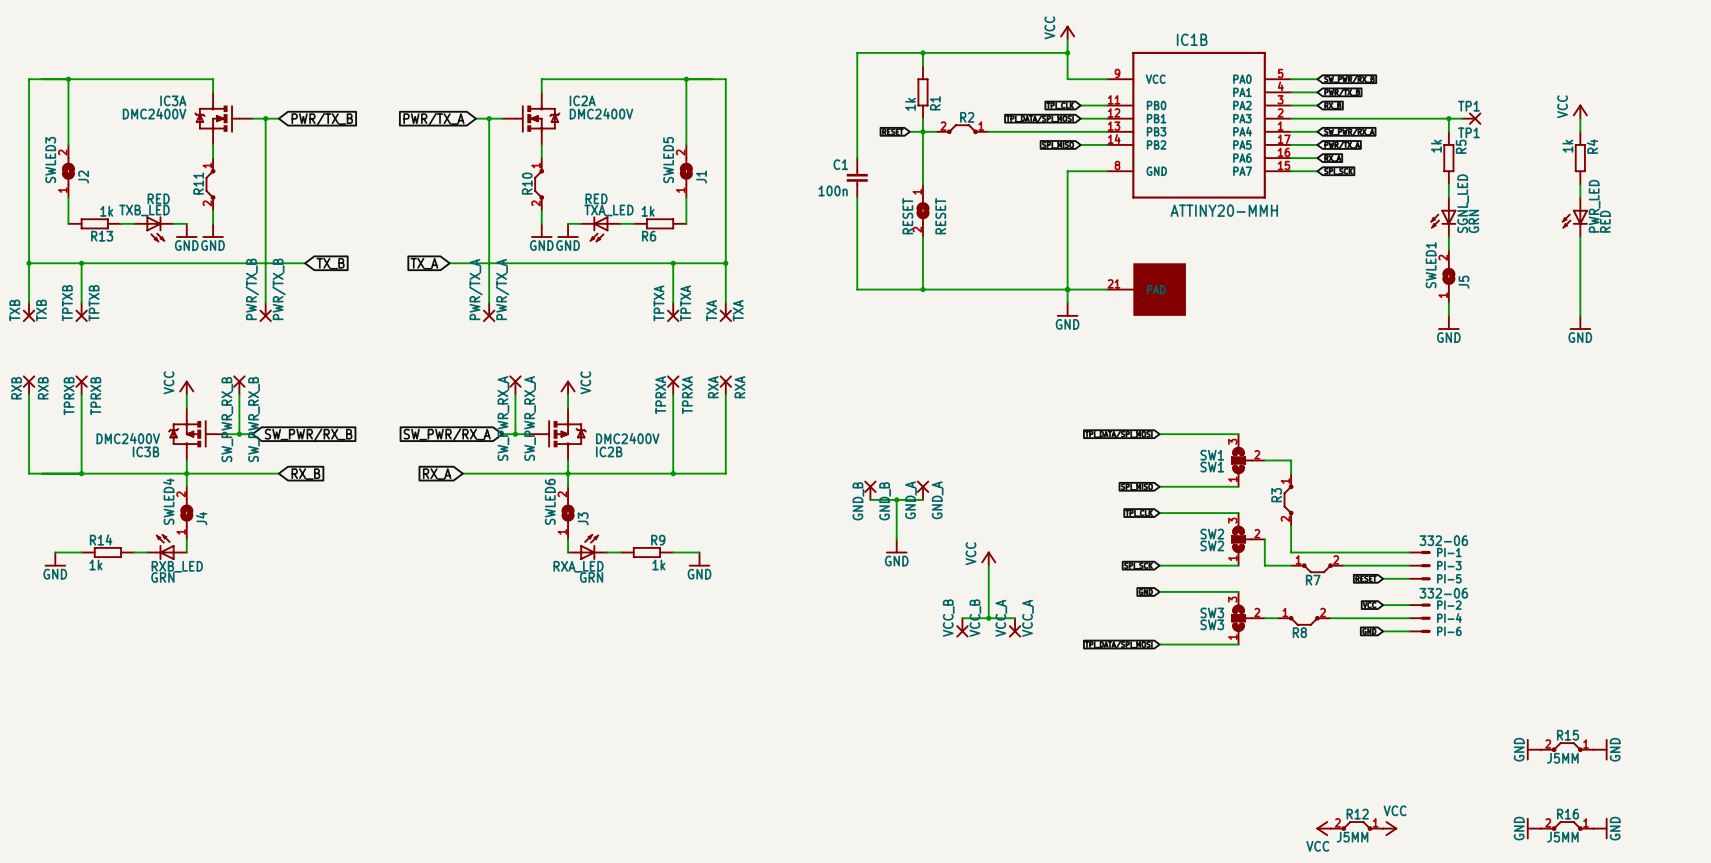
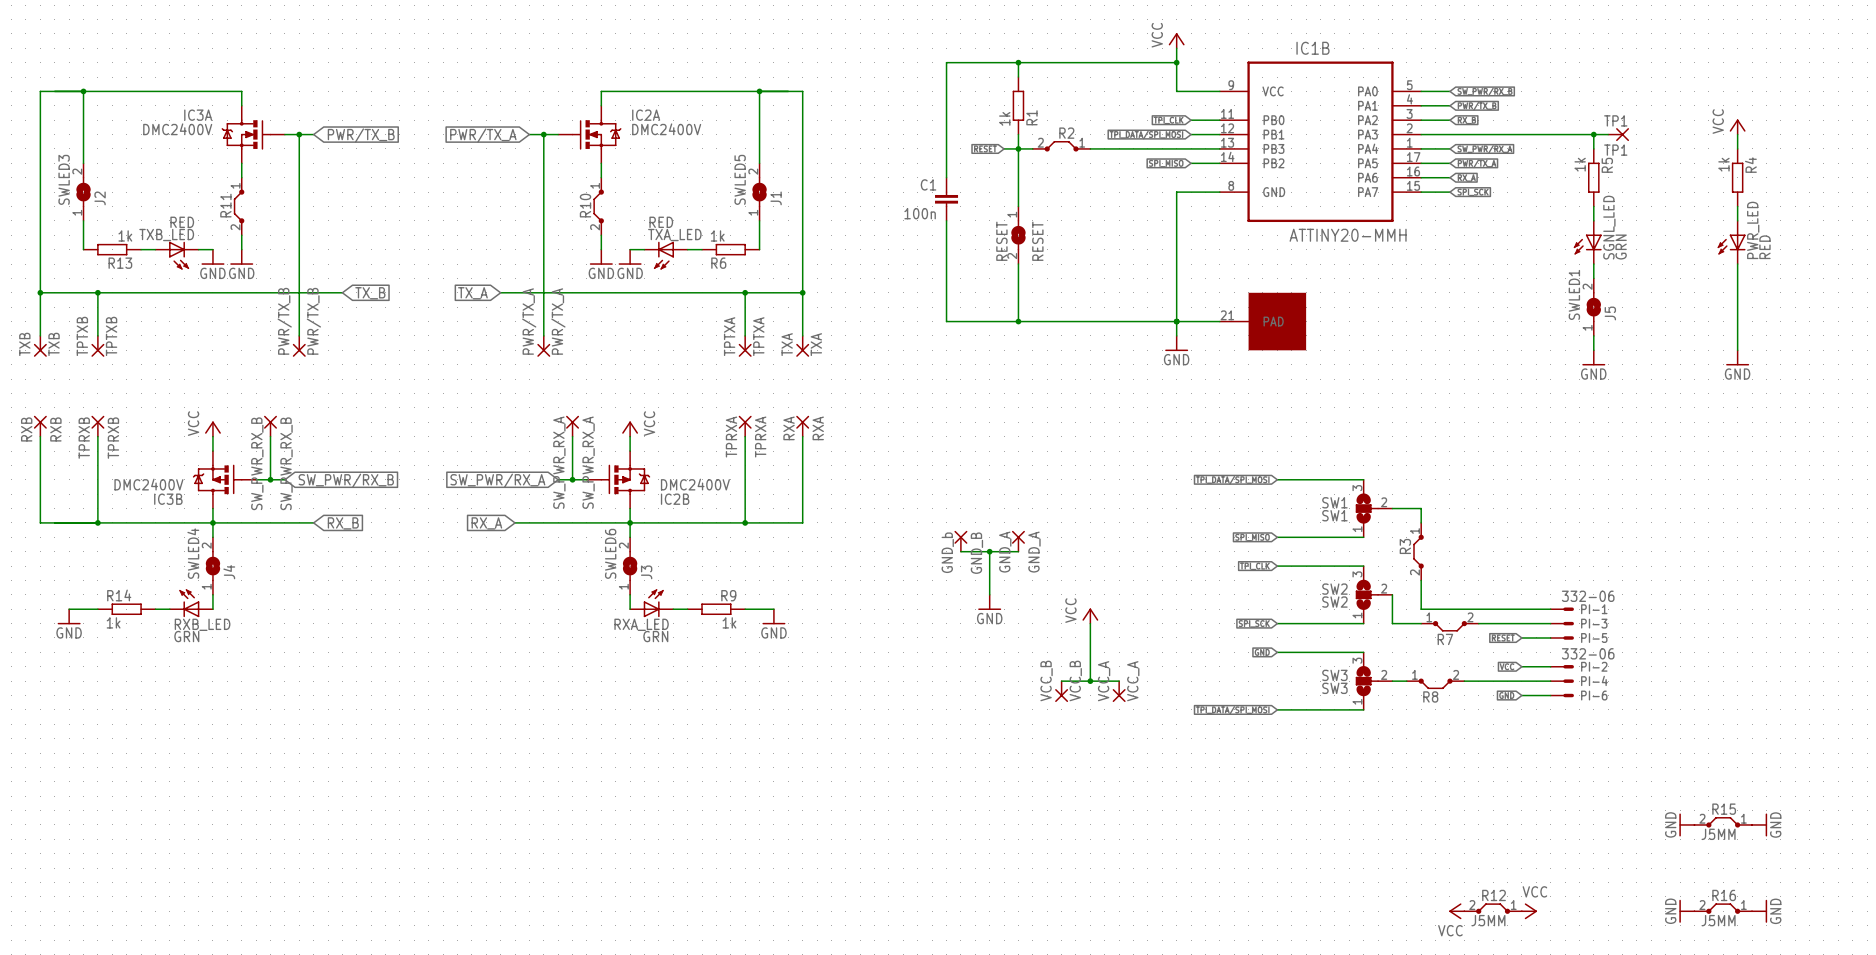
GND_B value: GND_B (858, 501) -> GND_b (947, 552)

